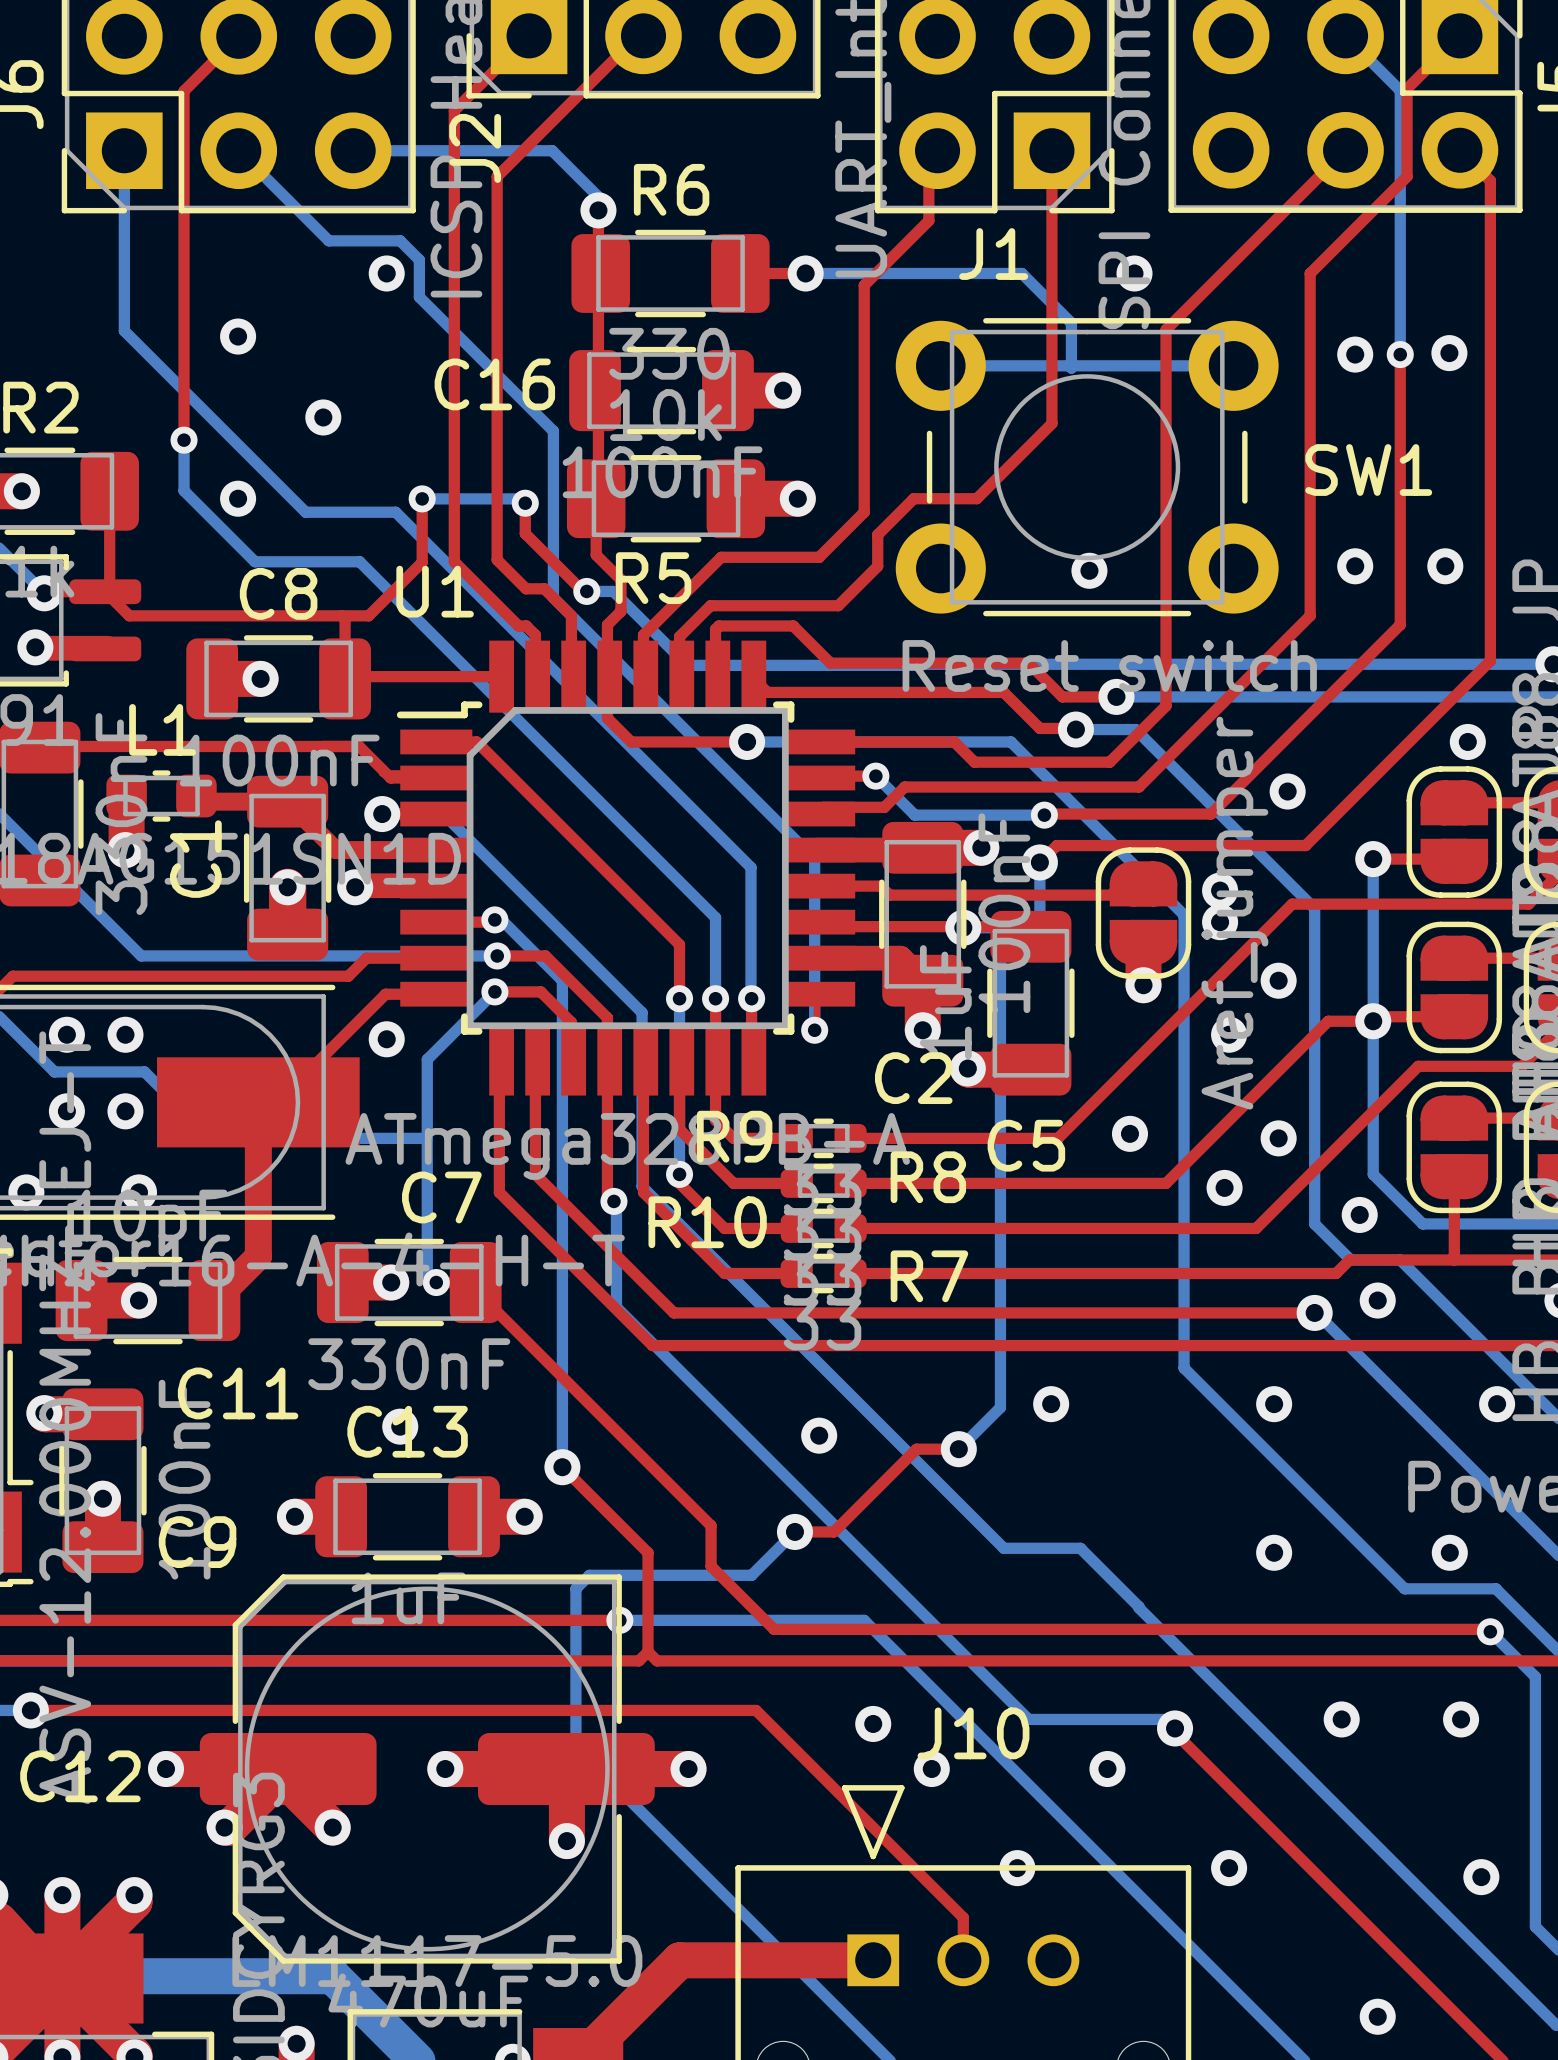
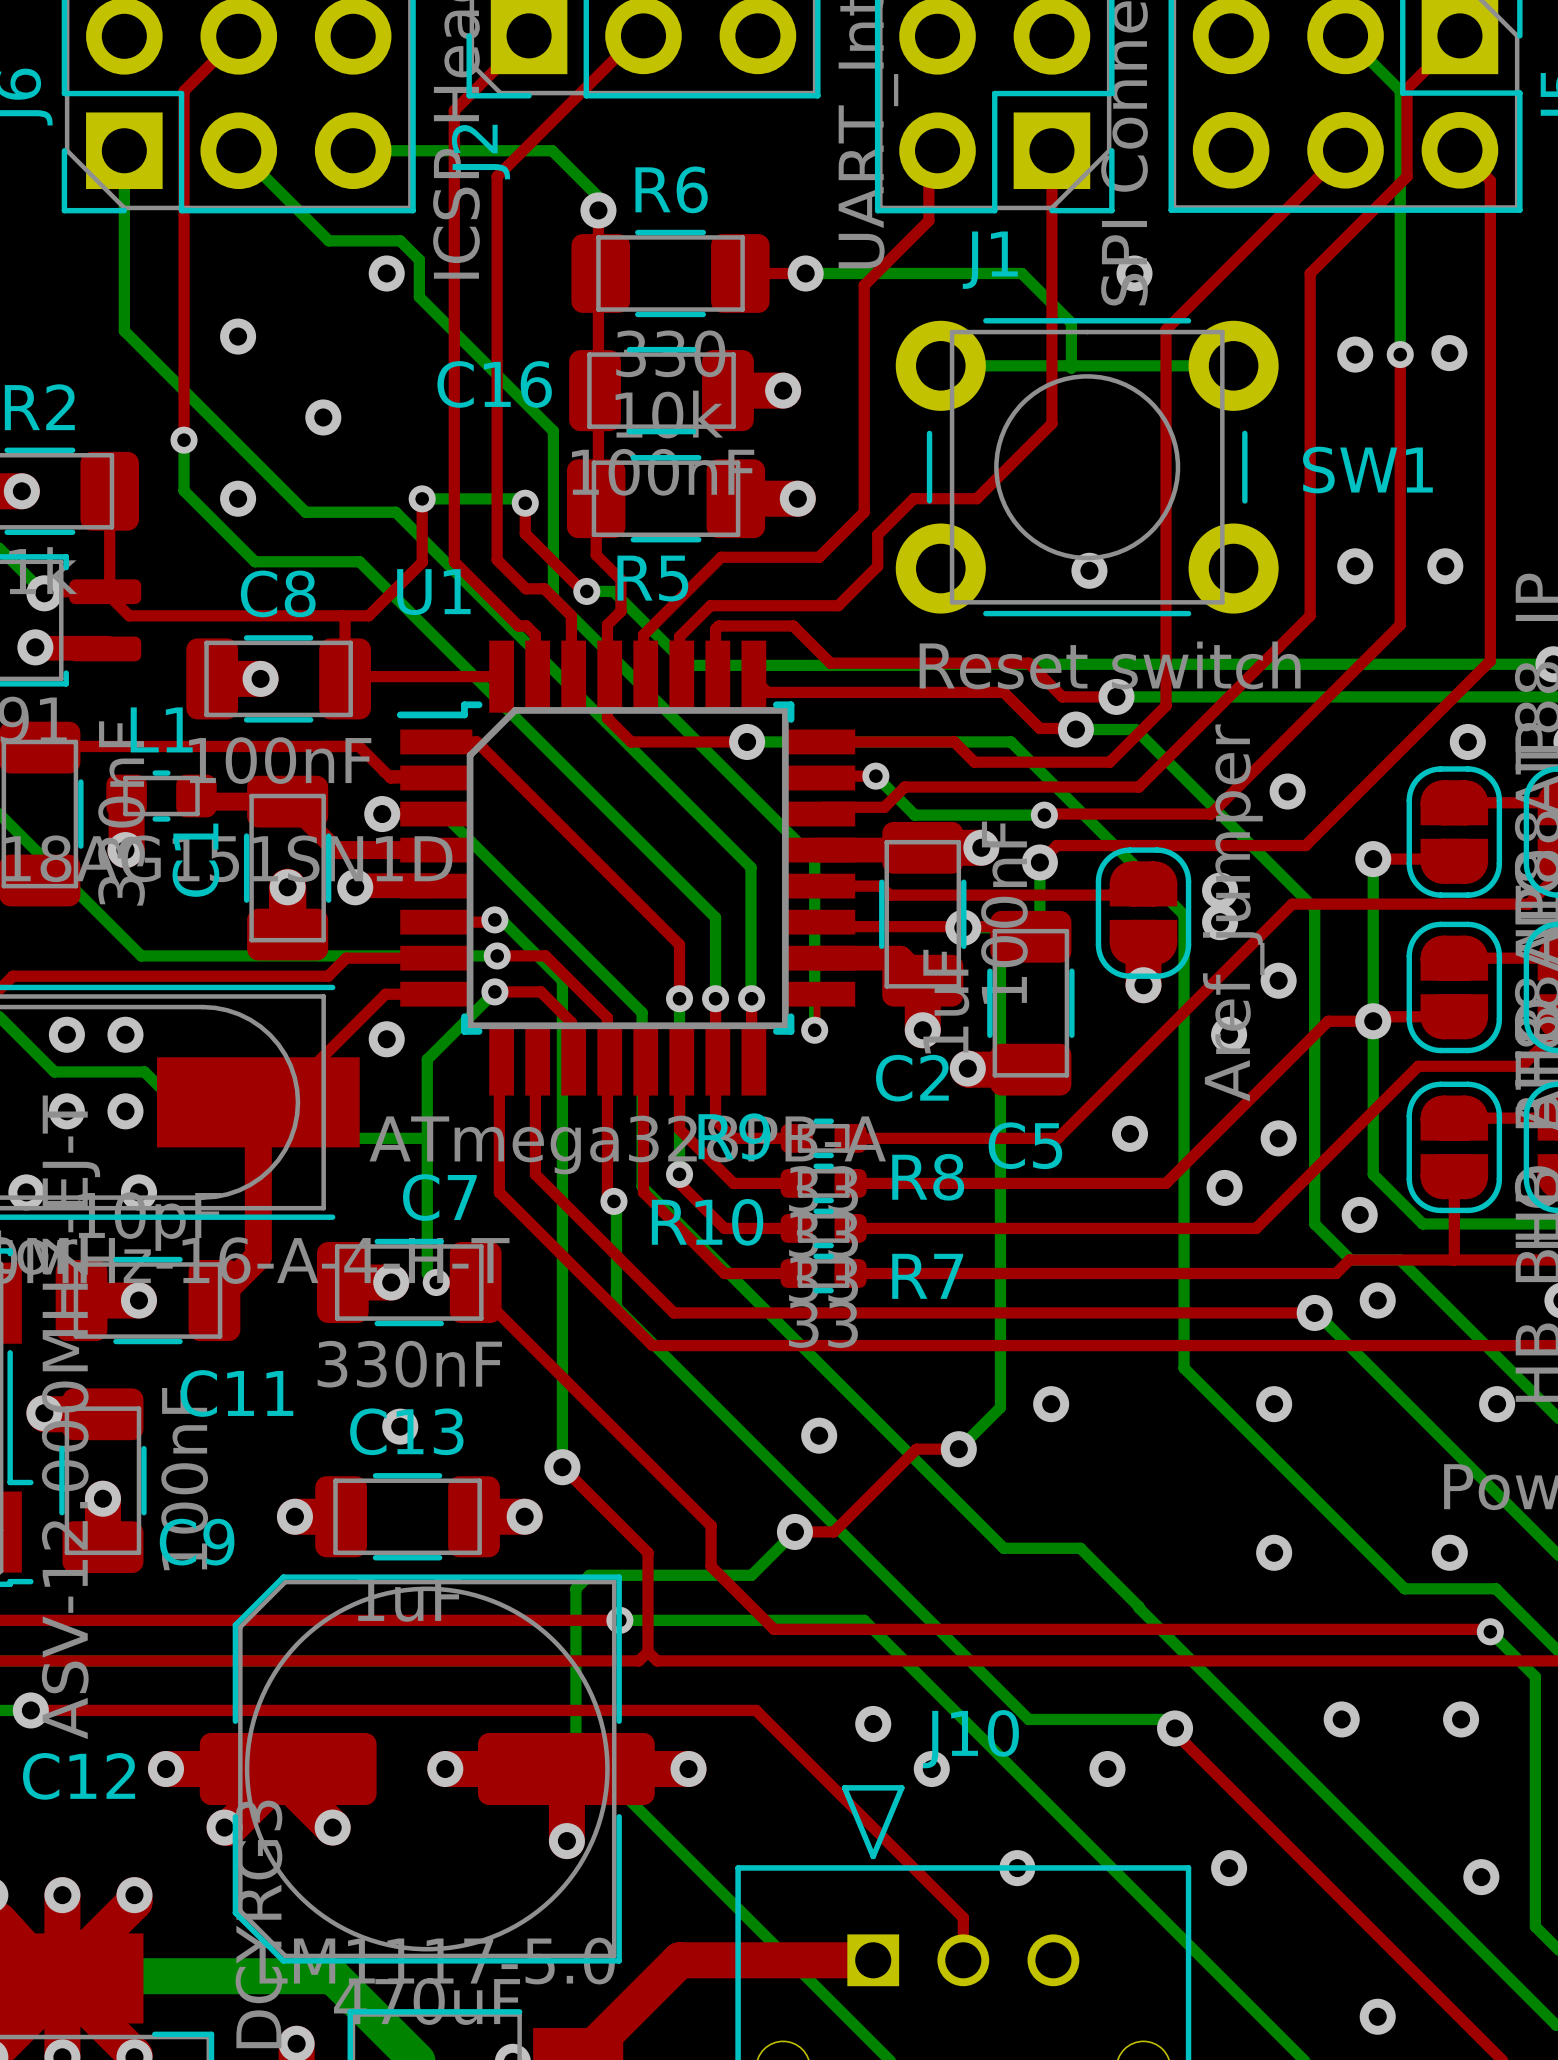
top track: (366, 958) (348, 976) (328, 976) -> (366, 958) (346, 958) (328, 976)

